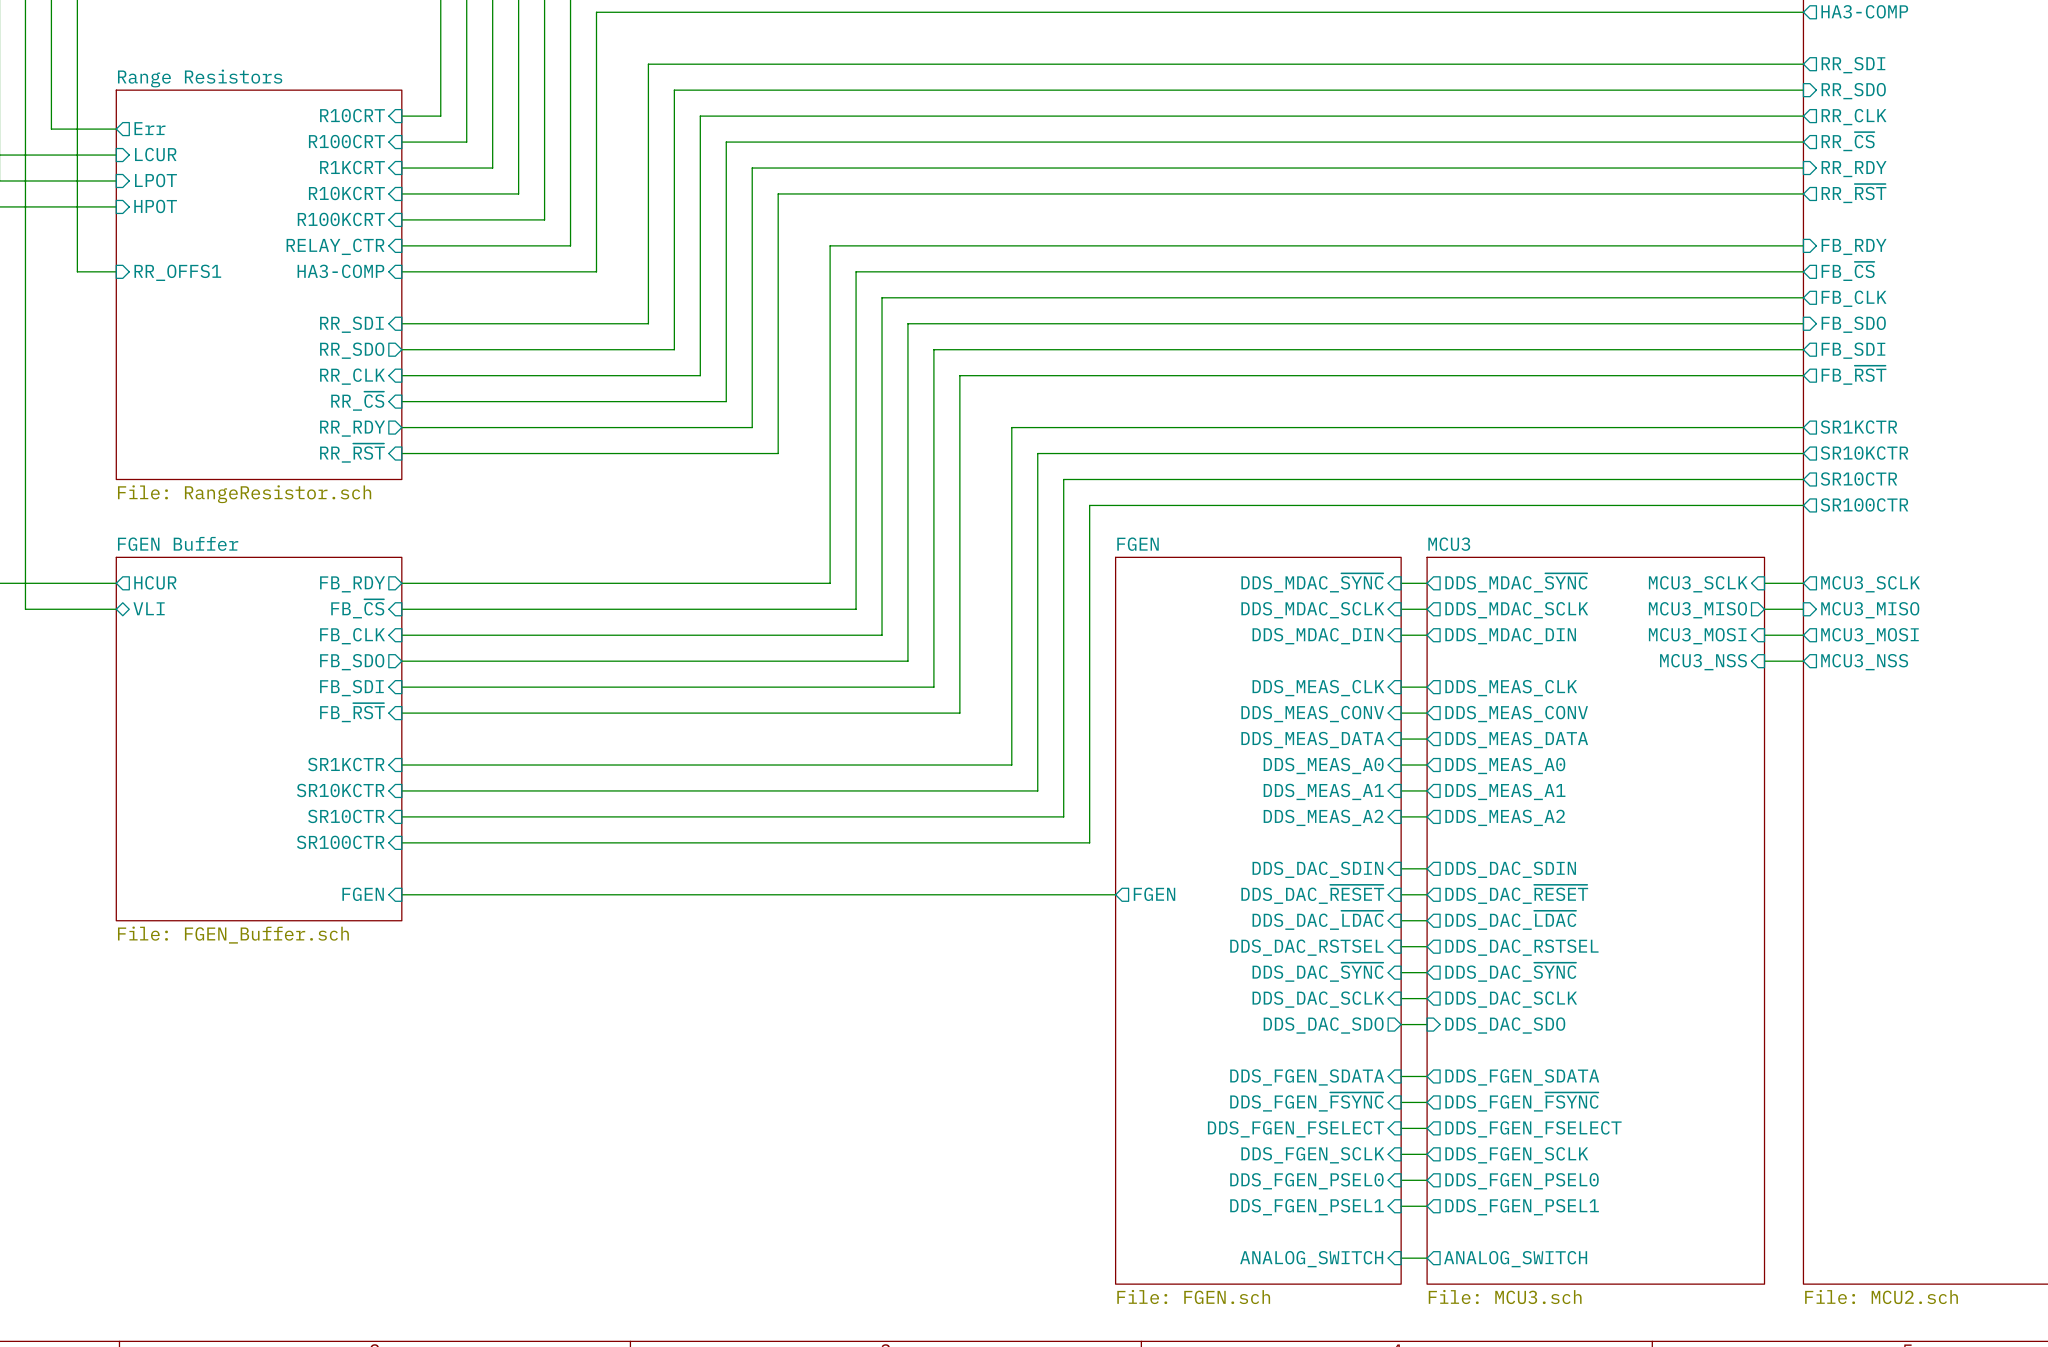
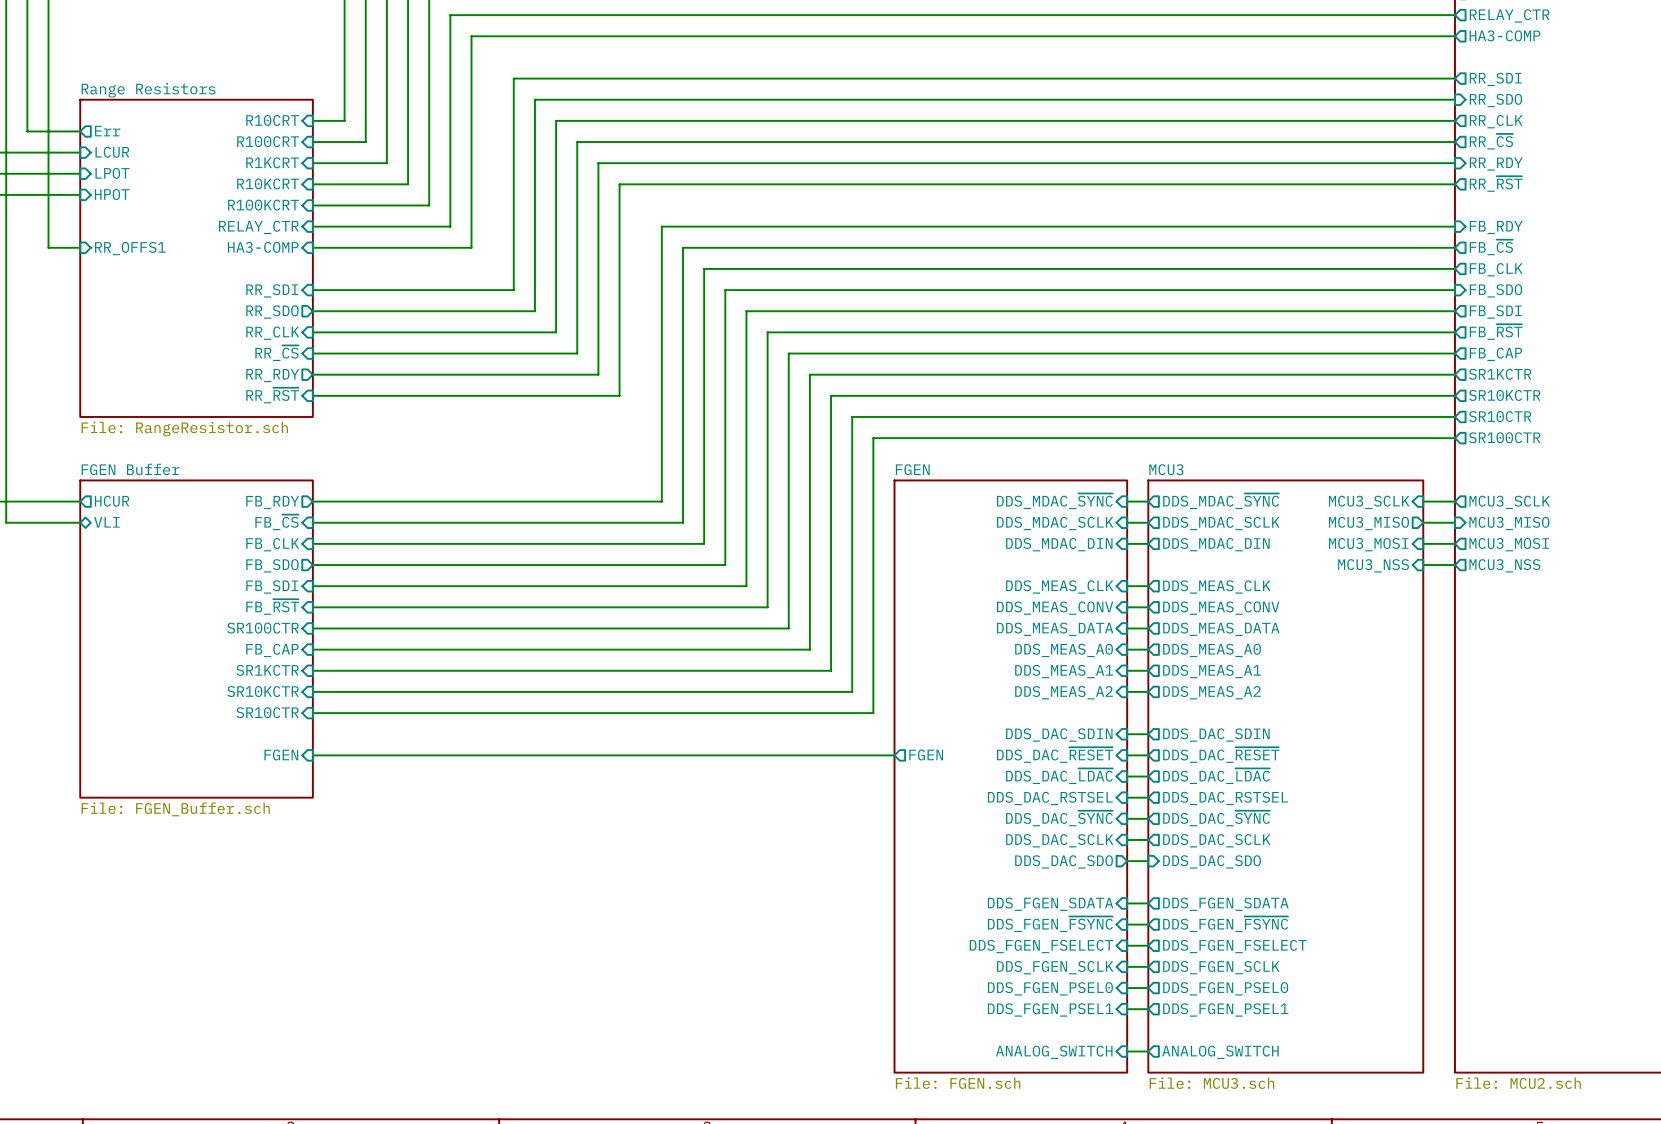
wire: none -> (1454, 353) (788, 353) (788, 628) (312, 628)
sheet pin: none -> FB_CAP (1495, 354)
sheet pin: none -> SR100CTR (263, 628)
sheet FGEN Buffer: File: FGEN_Buffer.sch (259, 739) -> none
sheet FGEN Buffer: none -> File: FGEN_Buffer.sch (196, 639)
sheet pin: SR1KCTR (346, 764) -> FB_CAP (272, 650)
sheet pin: SR10KCTR (340, 790) -> SR1KCTR (267, 670)
sheet pin: SR10CTR (346, 816) -> SR10KCTR (263, 691)
sheet pin: SR100CTR (340, 842) -> SR10CTR (267, 712)

